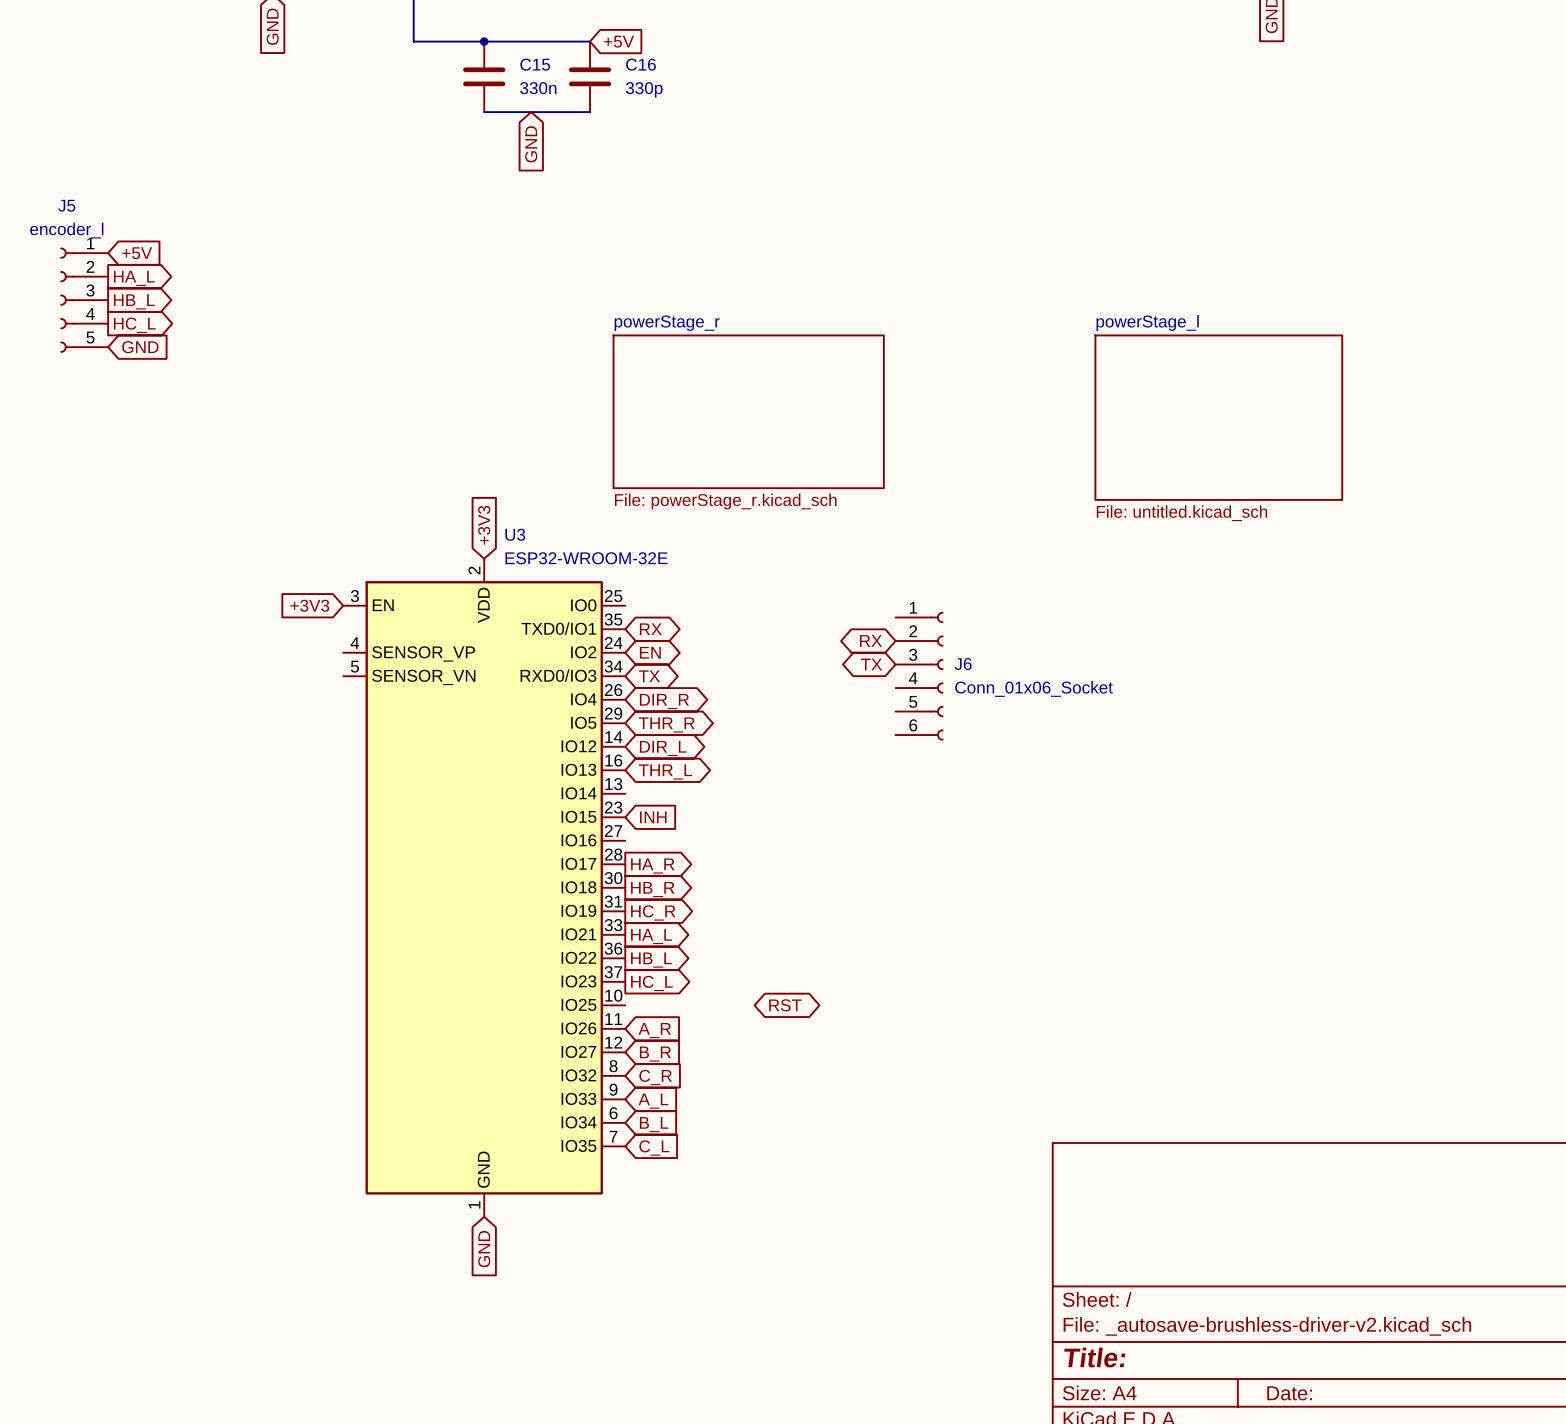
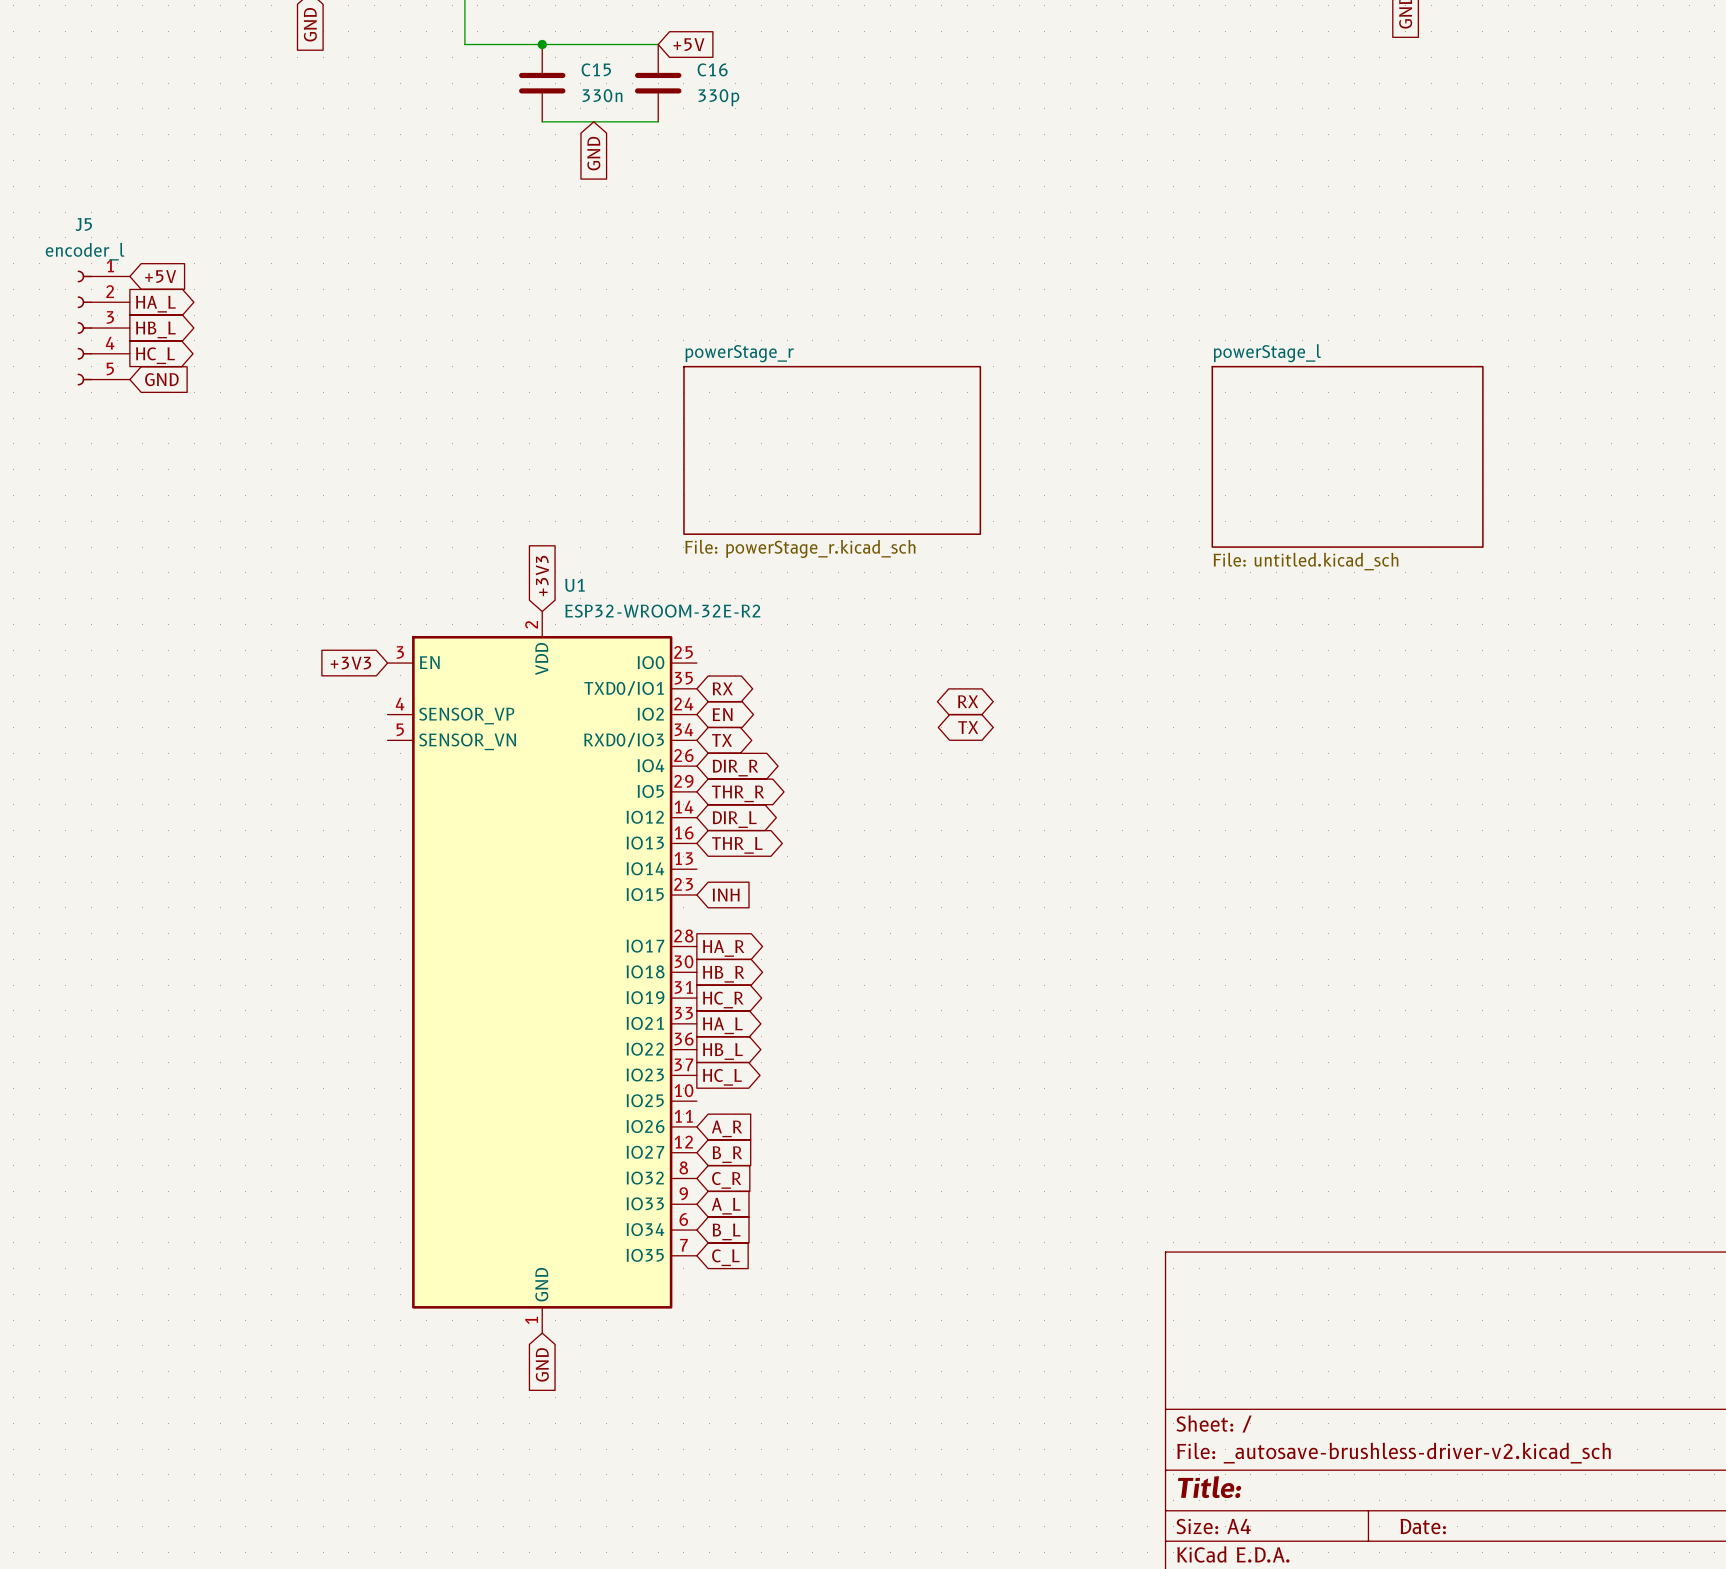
J6: Conn_01x06_Socket (919, 676) -> none
U3: ESP32-WROOM-32E (484, 887) -> none
U1: none -> ESP32-WROOM-32E-R2 (542, 972)
global label: RST (785, 1005) -> none

